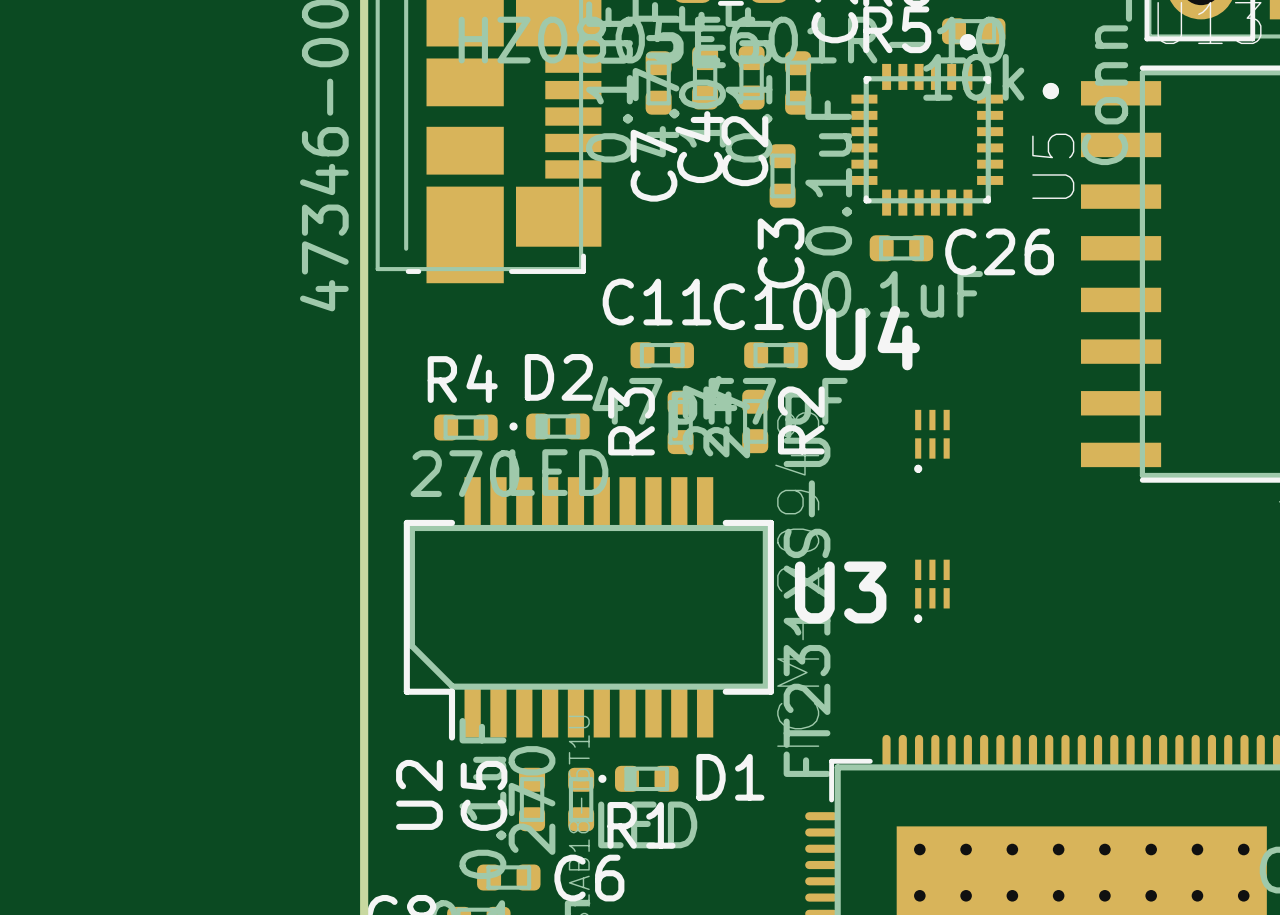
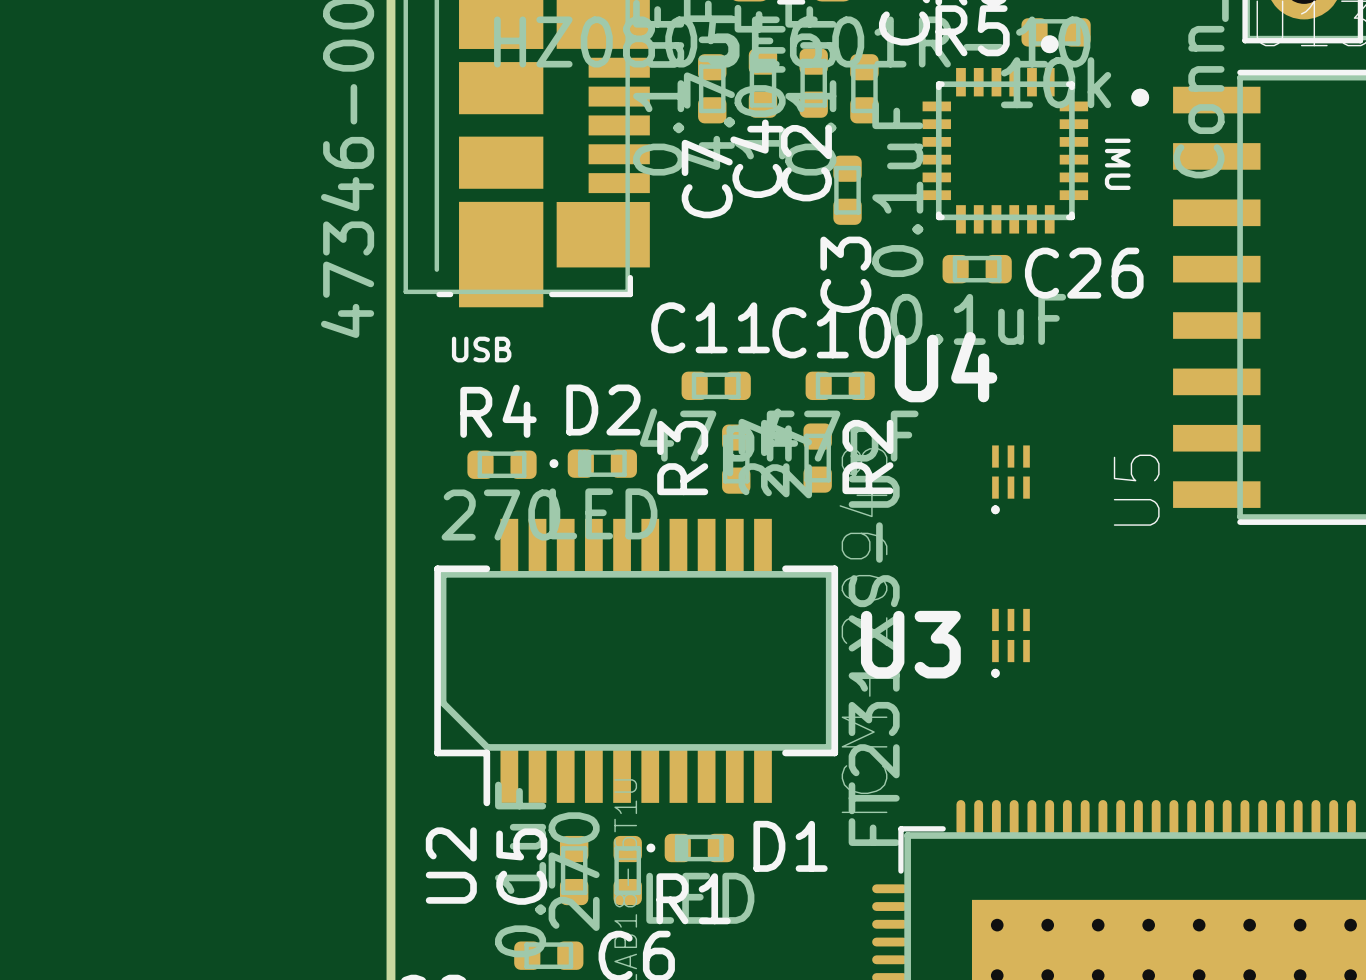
text: none -> IMU (1117, 164)
U5 name position: U5 (1053, 166) -> U5 (1136, 490)
text: none -> USB (481, 349)

